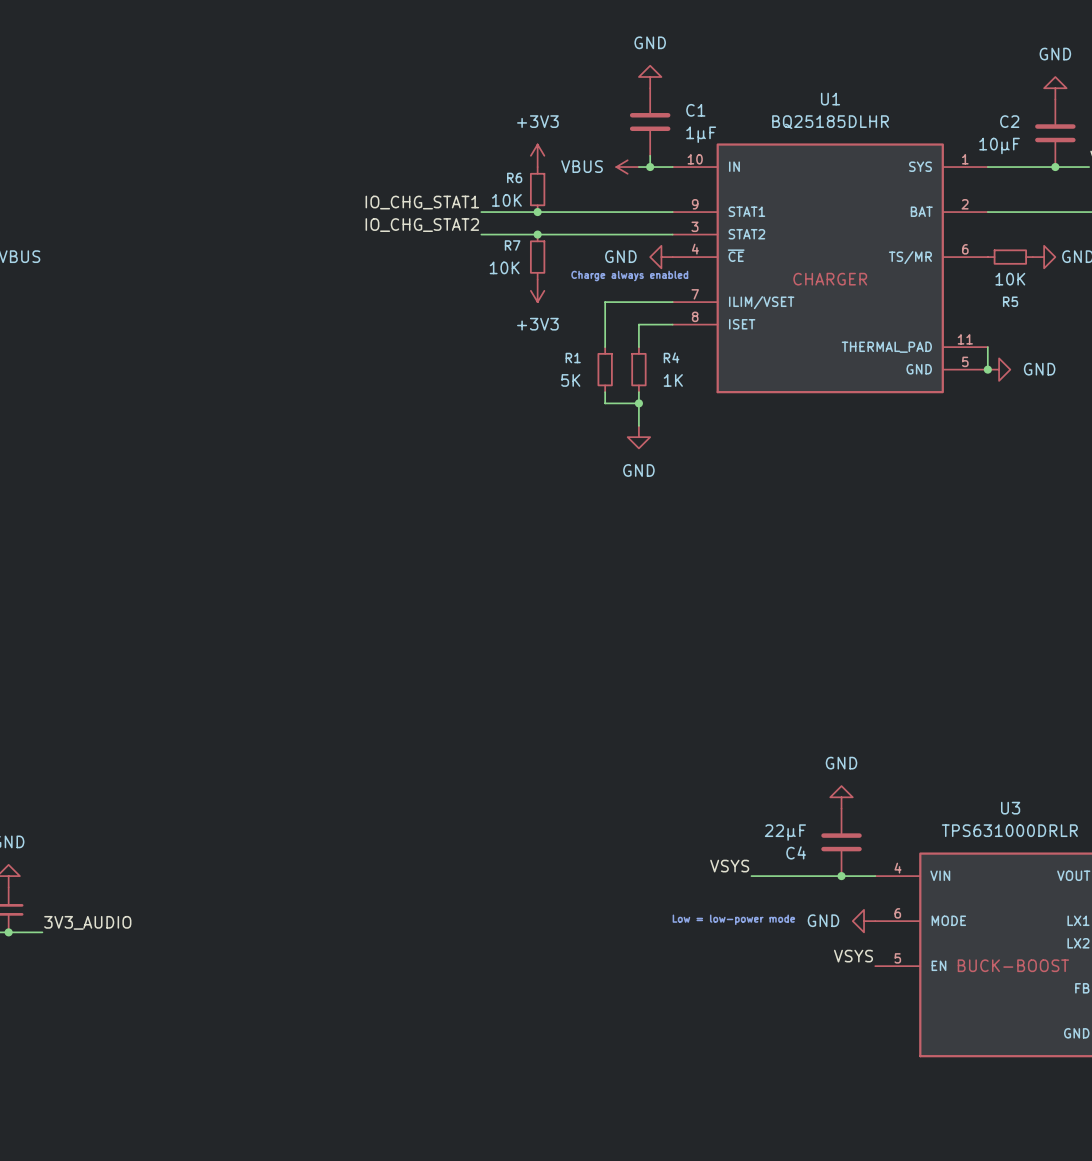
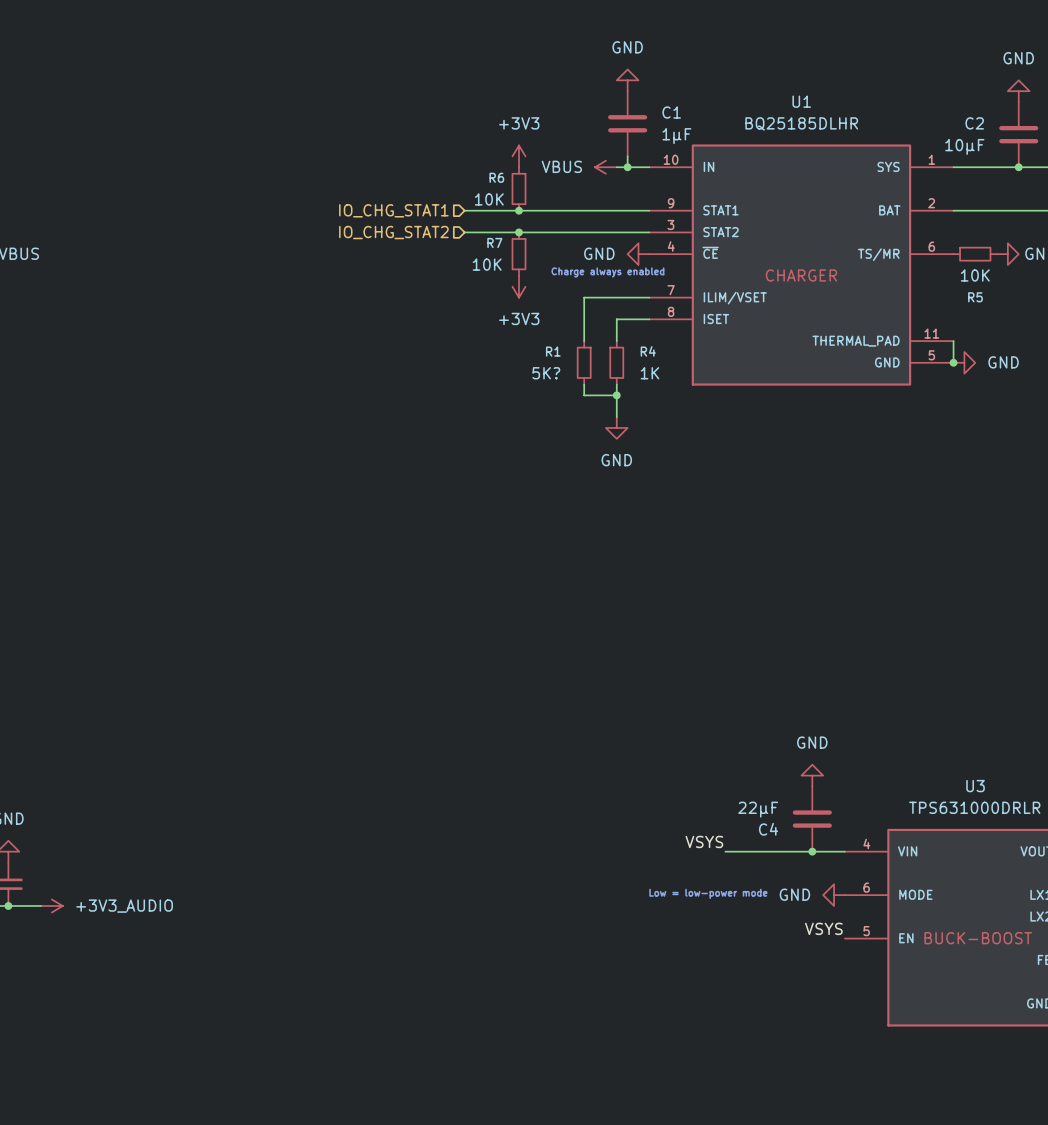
label: IO_CHG_STAT1 (422, 202) -> none
hierarchical label: none -> IO_CHG_STAT1 (393, 210)
label: IO_CHG_STAT2 (422, 225) -> none
hierarchical label: none -> IO_CHG_STAT2 (393, 232)
R1 value: 5K (570, 380) -> 5K? (546, 373)
label: 3V3_AUDIO (87, 922) -> none
power symbol: none -> +3V3_AUDIO (51, 905)

